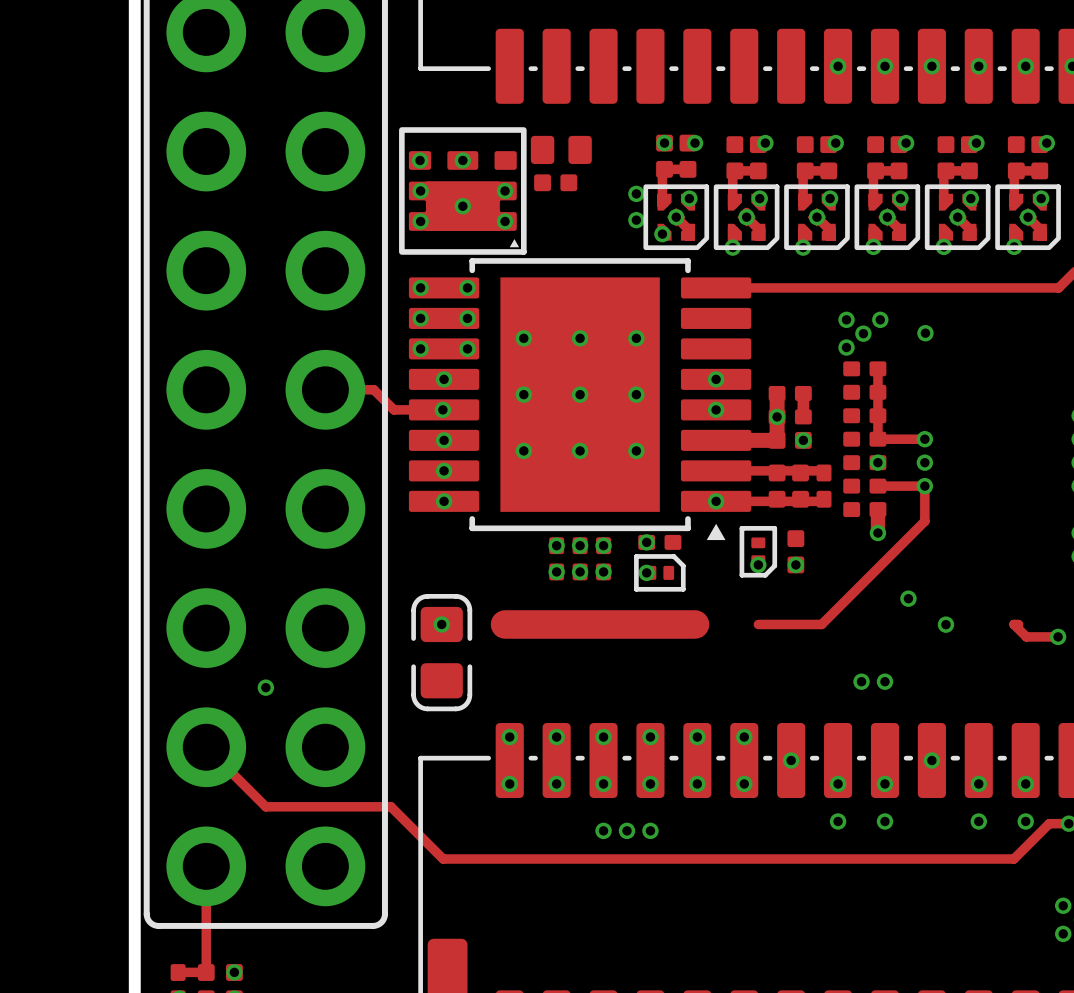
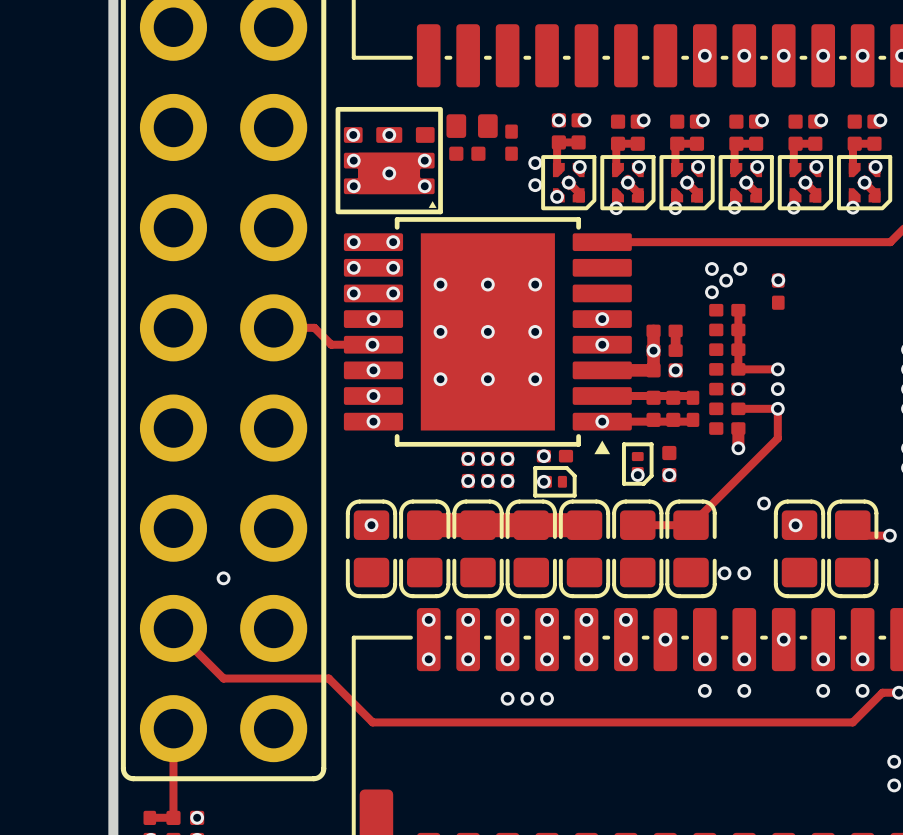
part: none -> (511, 142)
part: none -> (778, 291)
part: none -> (424, 548)
part: none -> (478, 548)
part: none -> (531, 548)
part: none -> (584, 548)
part: none -> (637, 548)
part: none -> (691, 548)
part: none -> (799, 548)
part: none -> (852, 548)

